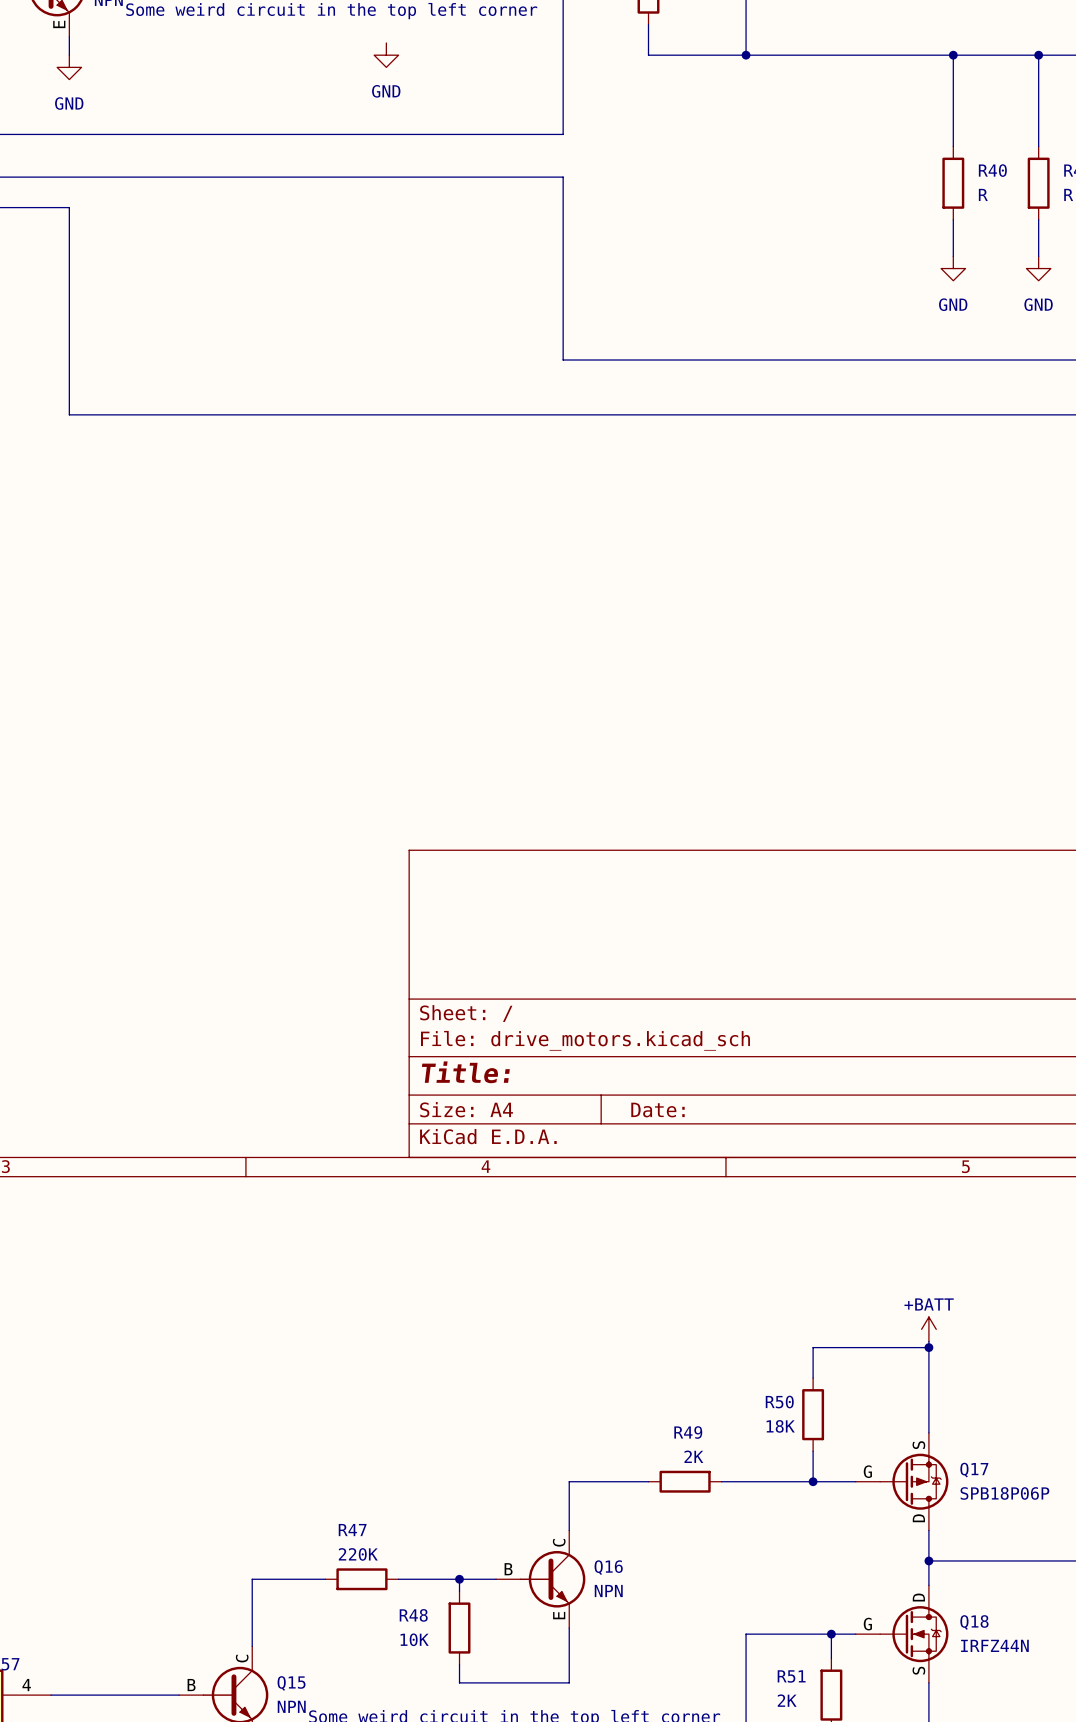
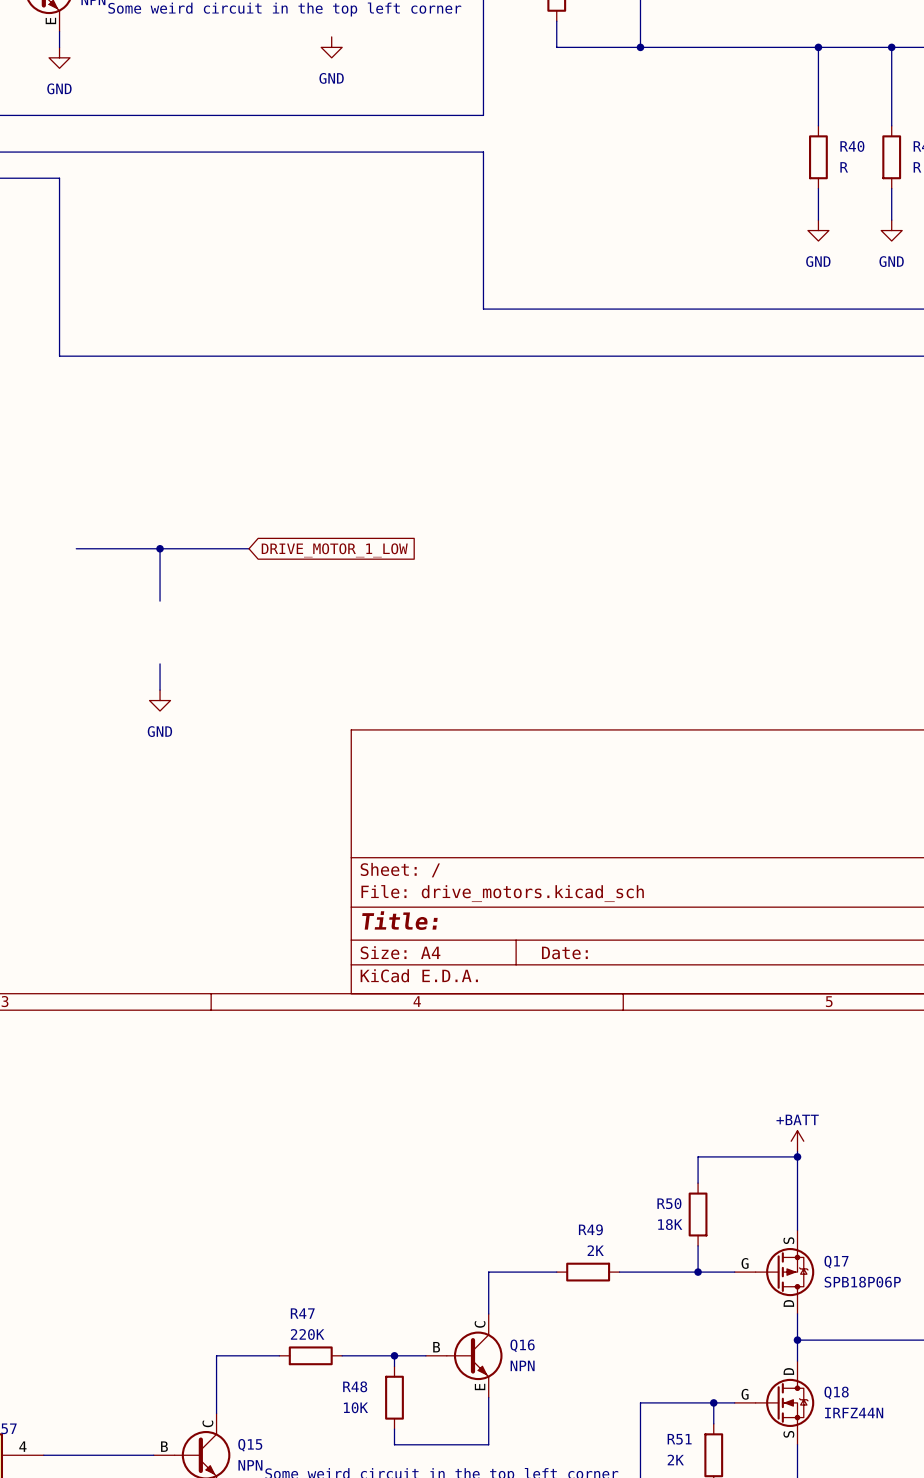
wire: none -> (76, 548) (248, 548)
wire: none -> (160, 548) (160, 601)
junction: none -> (160, 548)
global label: none -> DRIVE_MOTOR_1_LOW (334, 550)
wire: none -> (160, 663) (160, 690)
power symbol: none -> GND (160, 700)

